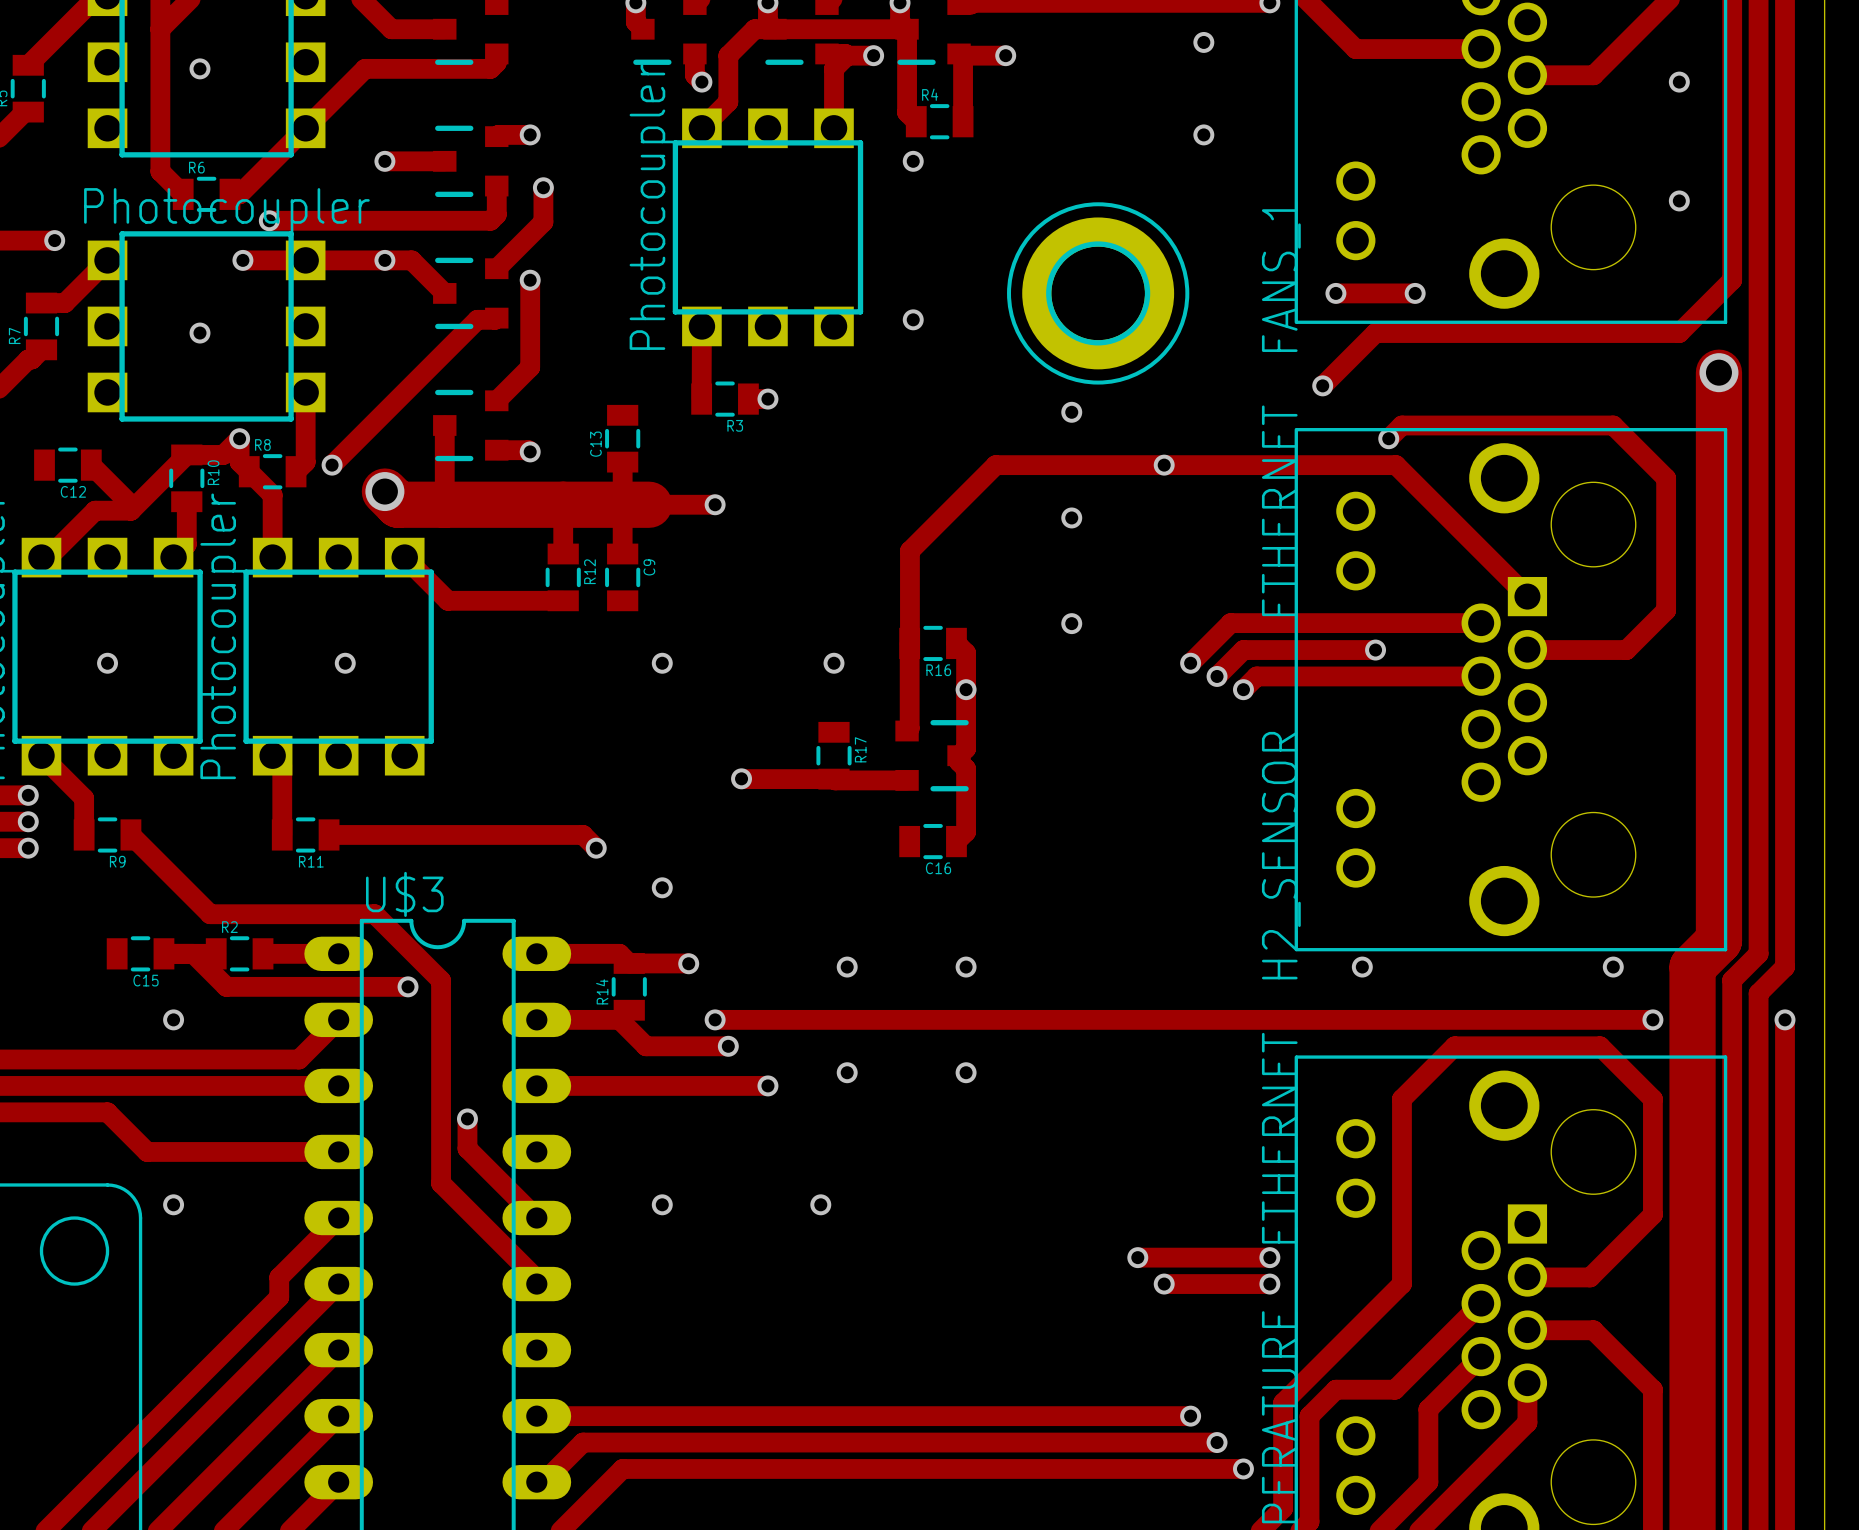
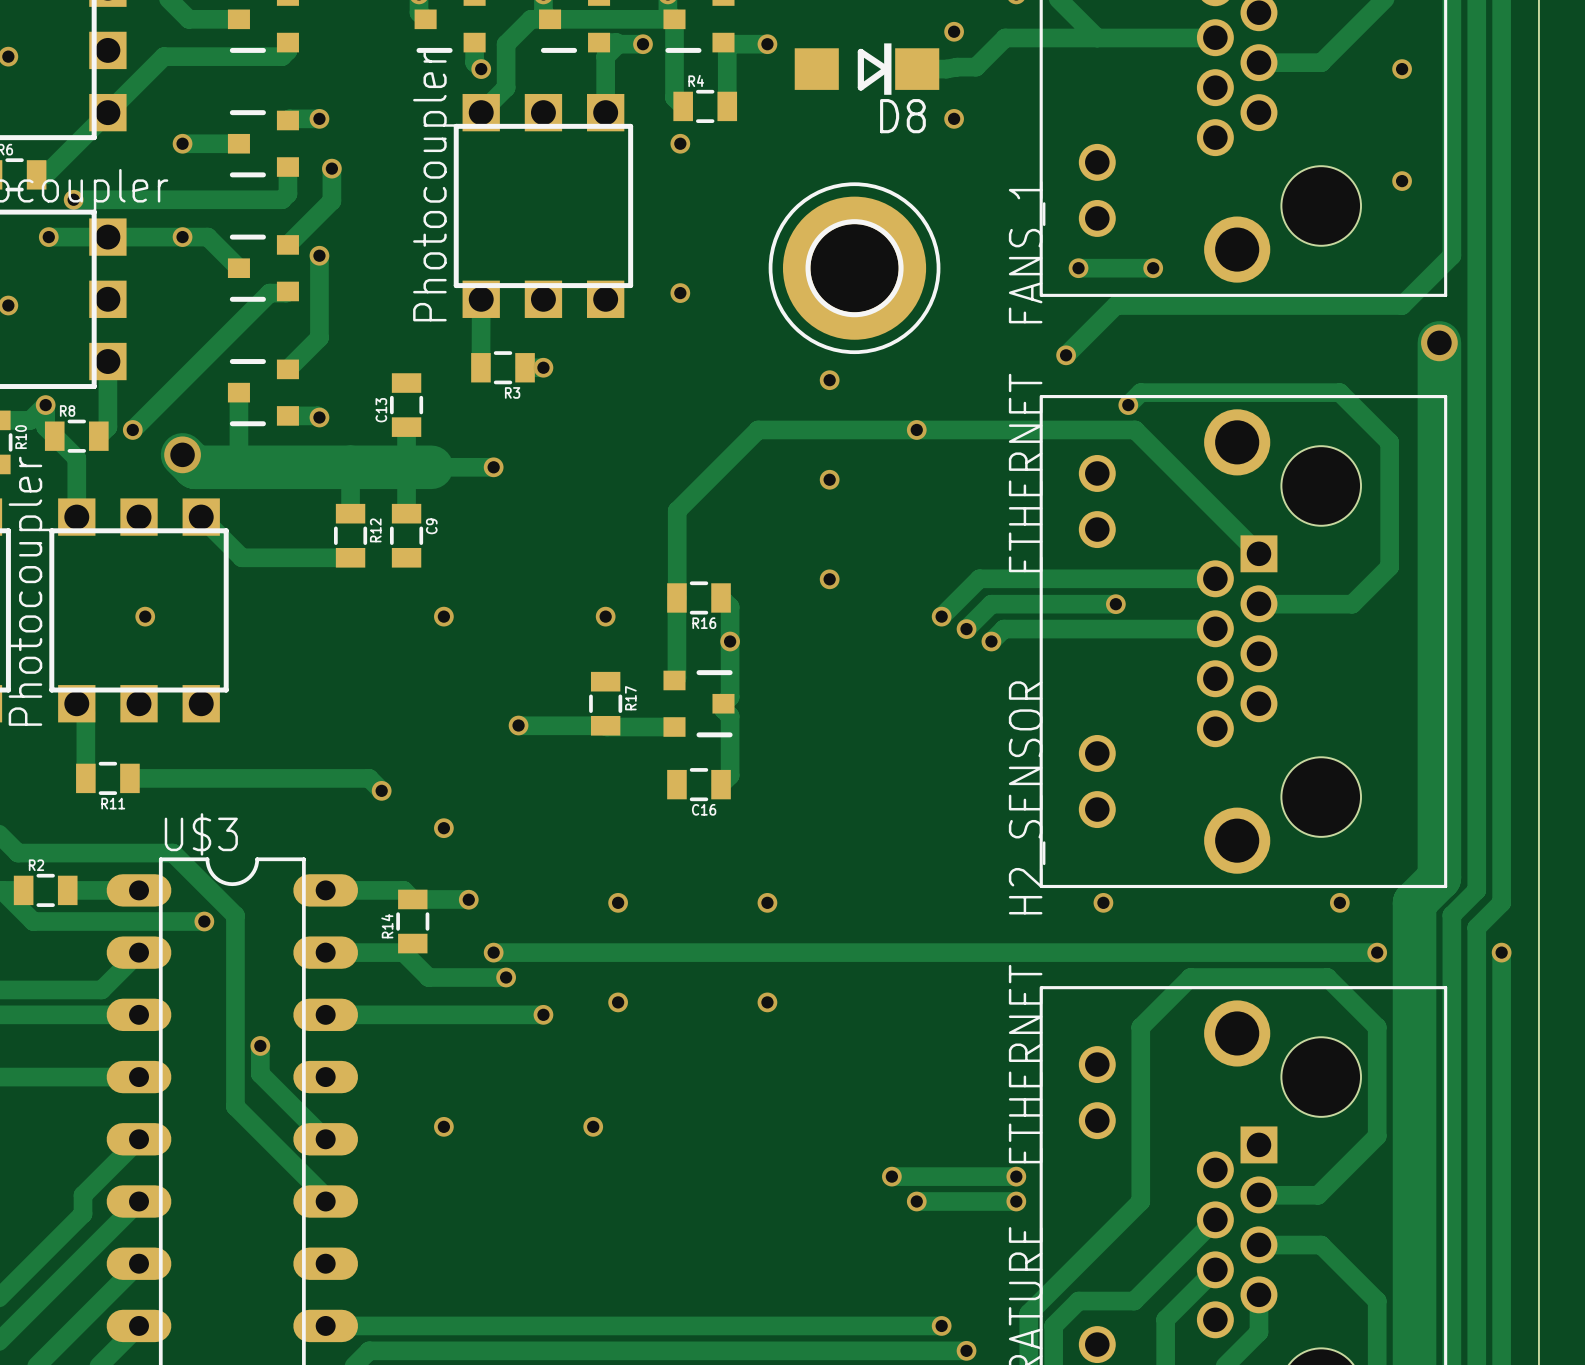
track: none -> (1097, 37) (1005, 37) (976, 67) (917, 69)
D8: none -> (866, 69)
via position: (966, 967) -> (767, 902)
via position: (966, 1072) -> (767, 1002)

